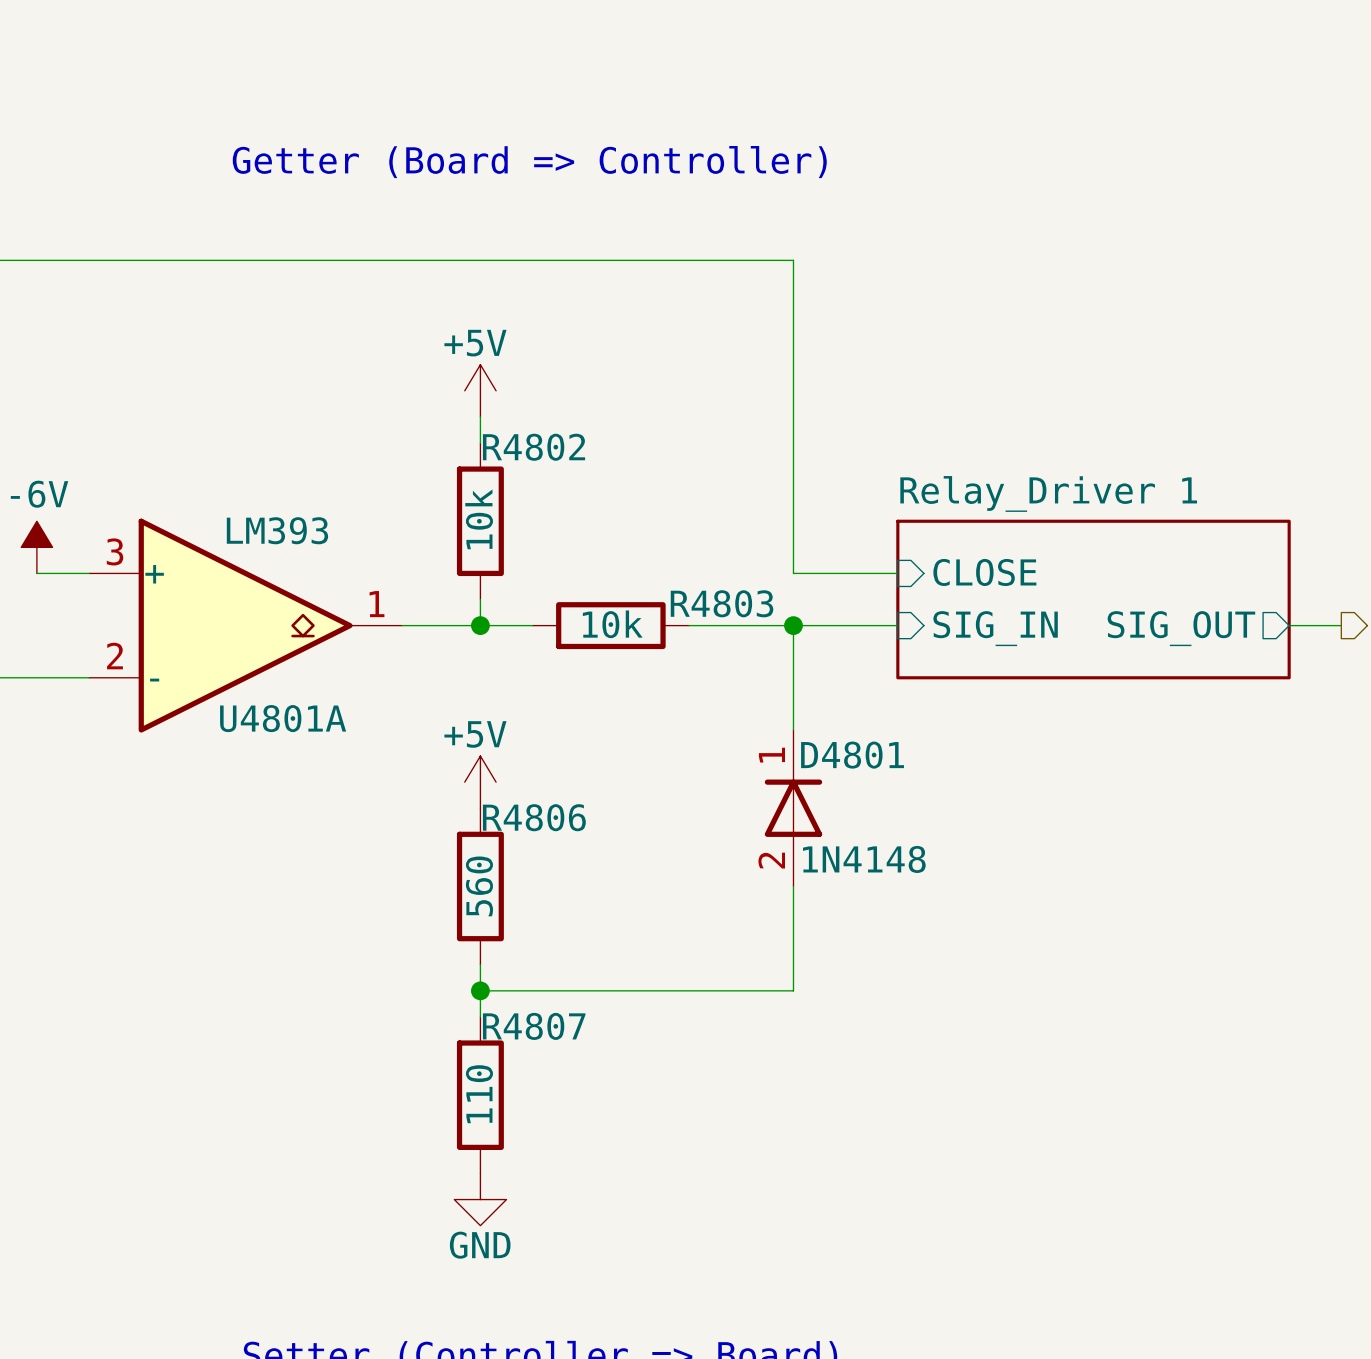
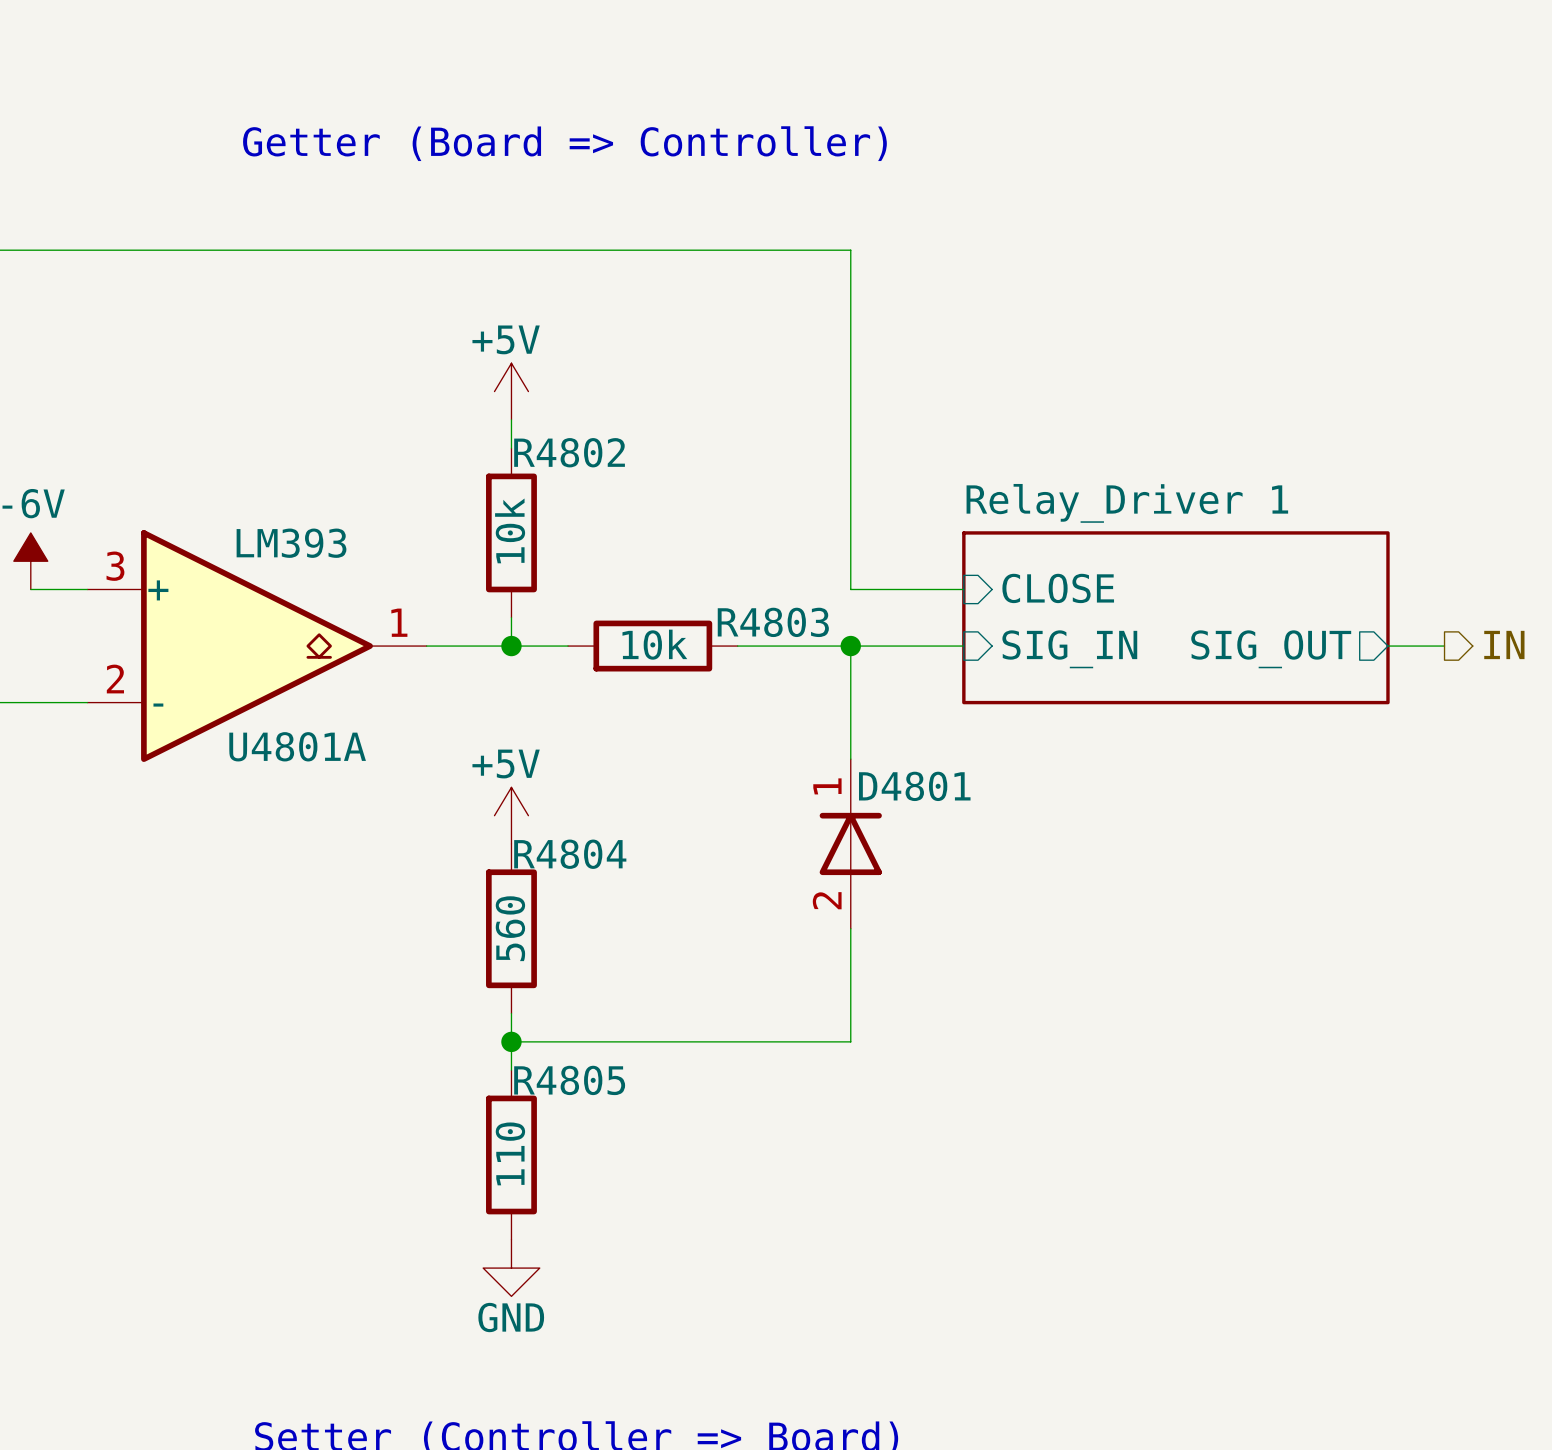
R4806 name: R4806 (534, 817) -> R4804 (570, 854)
D4801 value: 1N4148 (864, 859) -> none
R4807 name: R4807 (534, 1026) -> R4805 (569, 1080)

